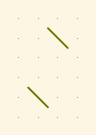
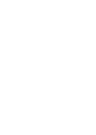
wire: (47, 28) (67, 47) -> none
wire: (28, 87) (47, 107) -> none

